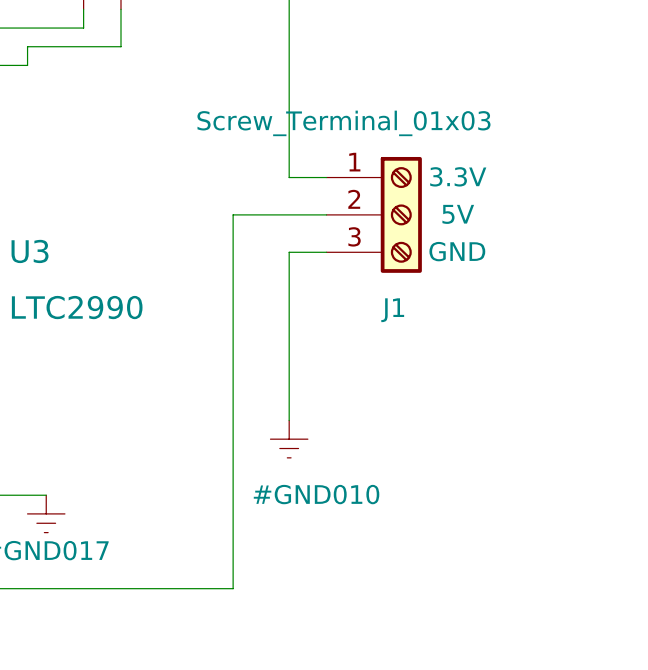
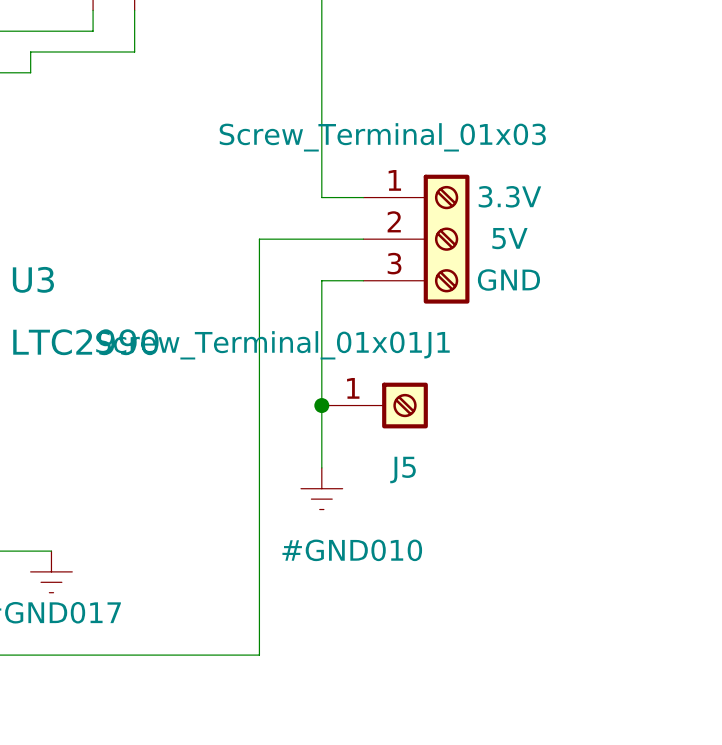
junction: none -> (321, 405)
J5: none -> Screw_Terminal_01x01 (374, 405)

